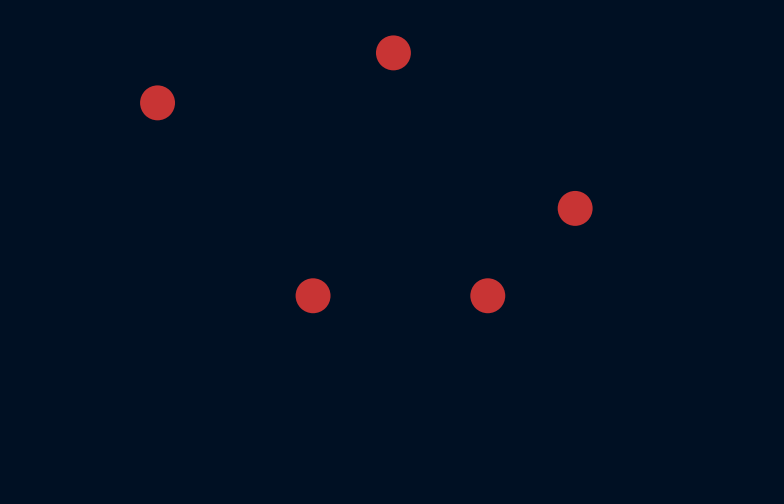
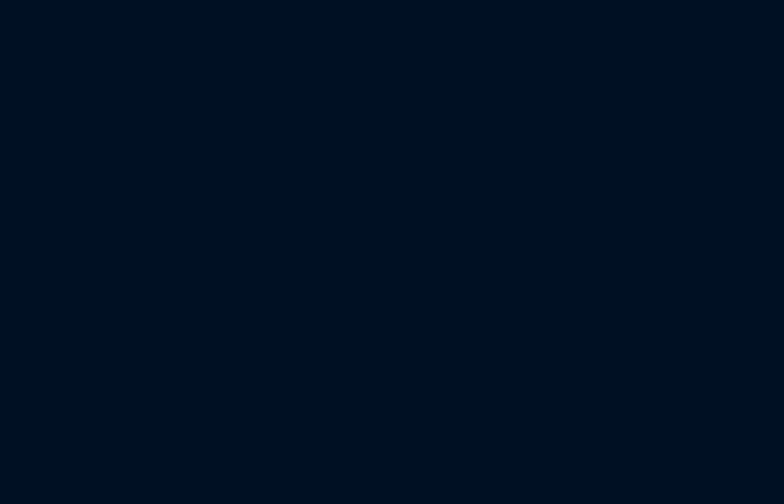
part: (393, 52) -> none
part: (157, 102) -> none
part: (575, 208) -> none
part: (313, 295) -> none
part: (487, 295) -> none

